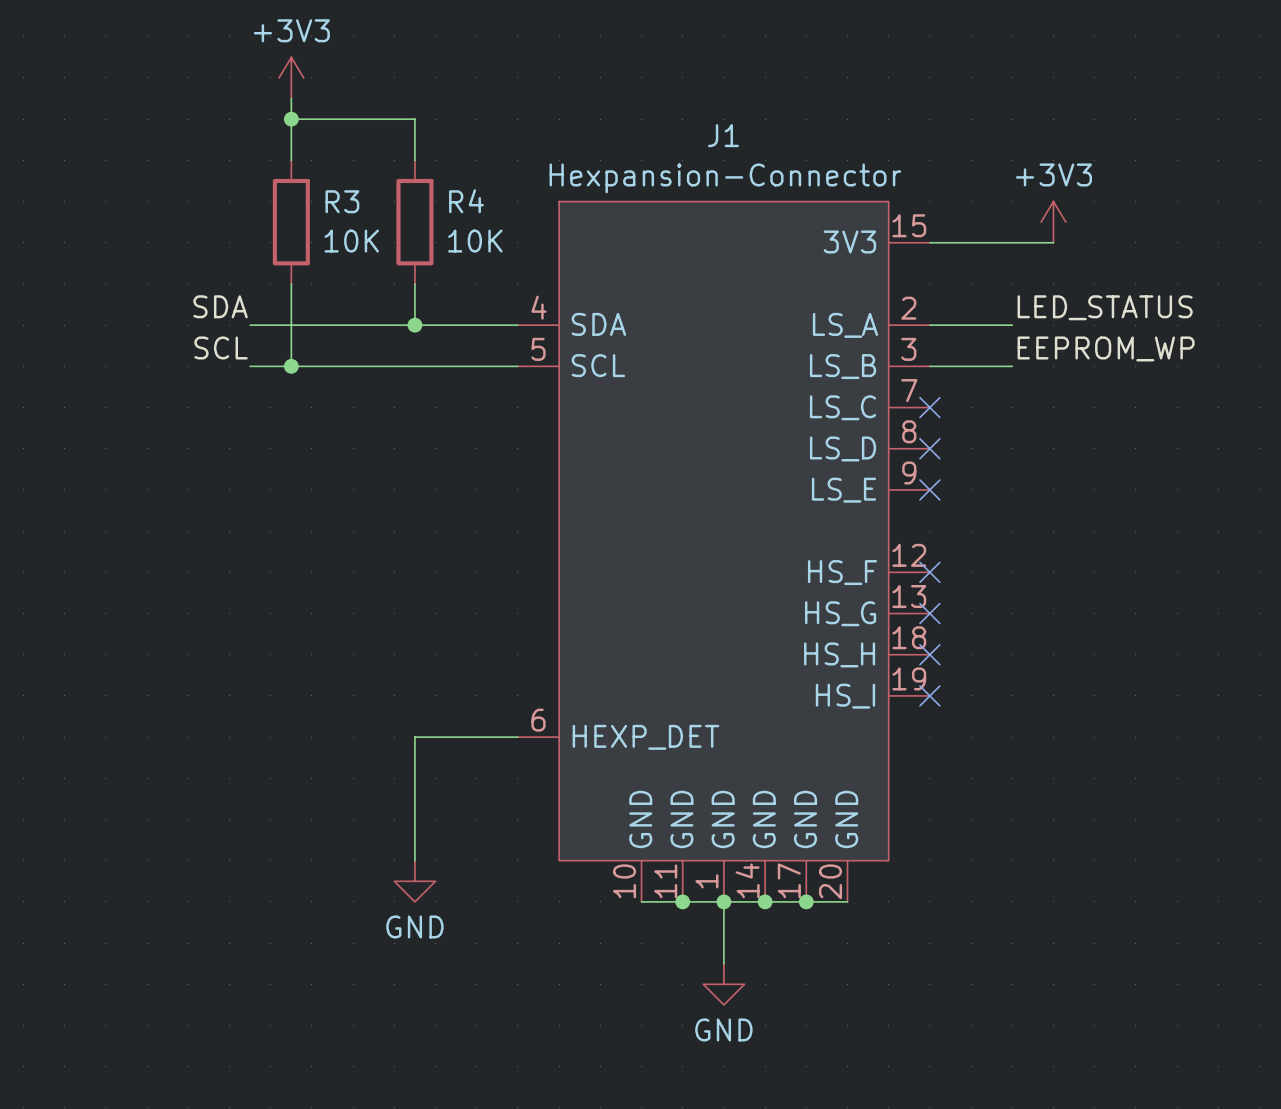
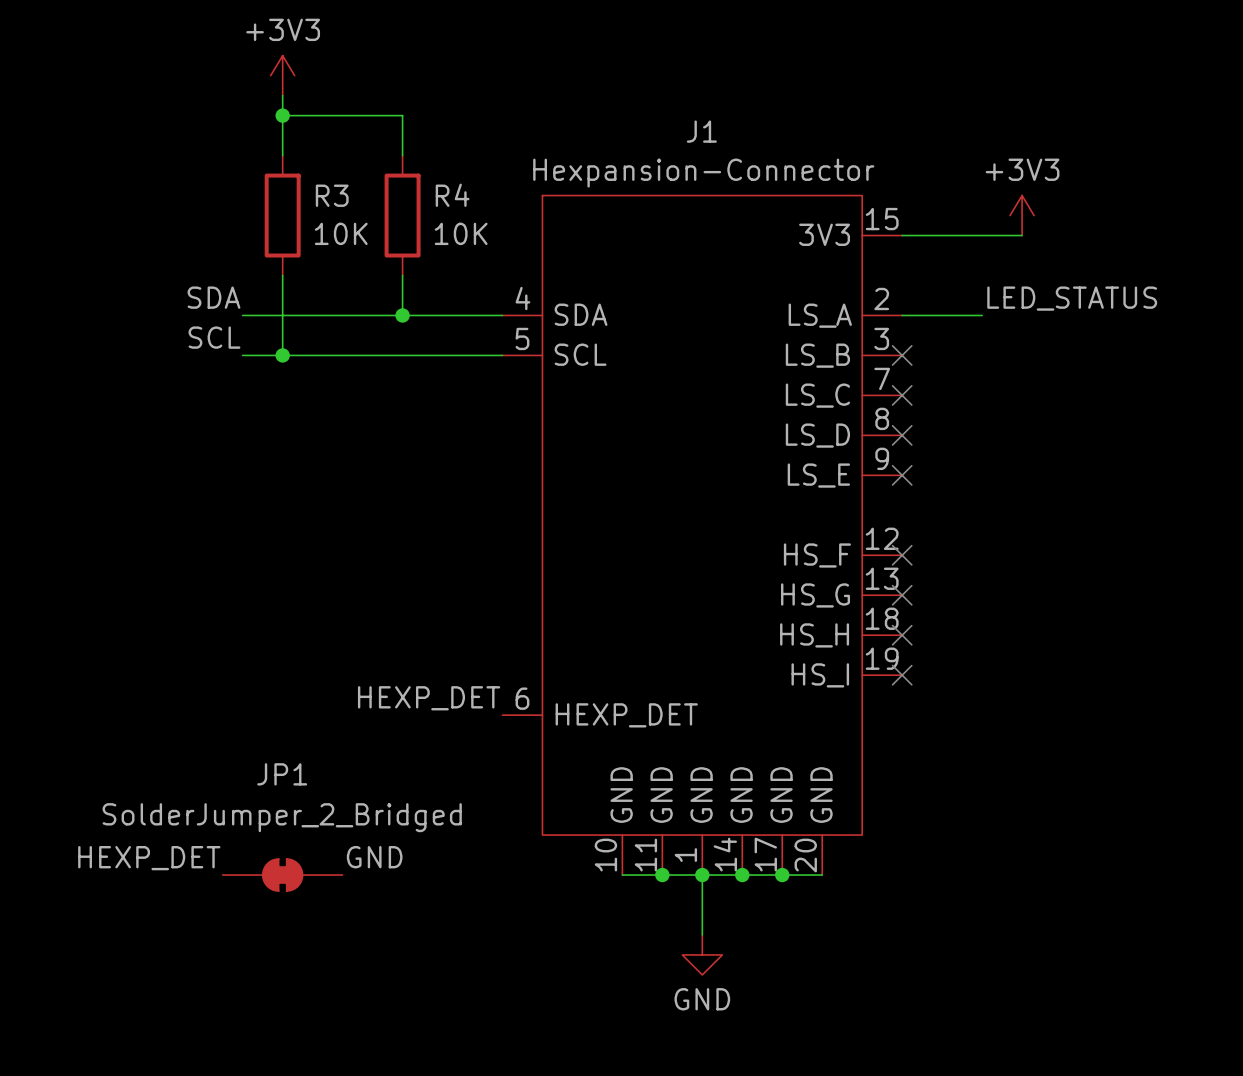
label: EEPROM_WP (1106, 348) -> none
wire: (929, 366) (1012, 366) -> none
no-connect mark: none -> (902, 355)
label: none -> HEXP_DET (429, 698)
wire: (517, 737) (414, 737) (414, 860) -> none
power symbol: GND (414, 881) -> none
label: none -> GND (374, 857)
label: none -> HEXP_DET (149, 858)
JP1: none -> SolderJumper_2_Bridged (282, 875)

